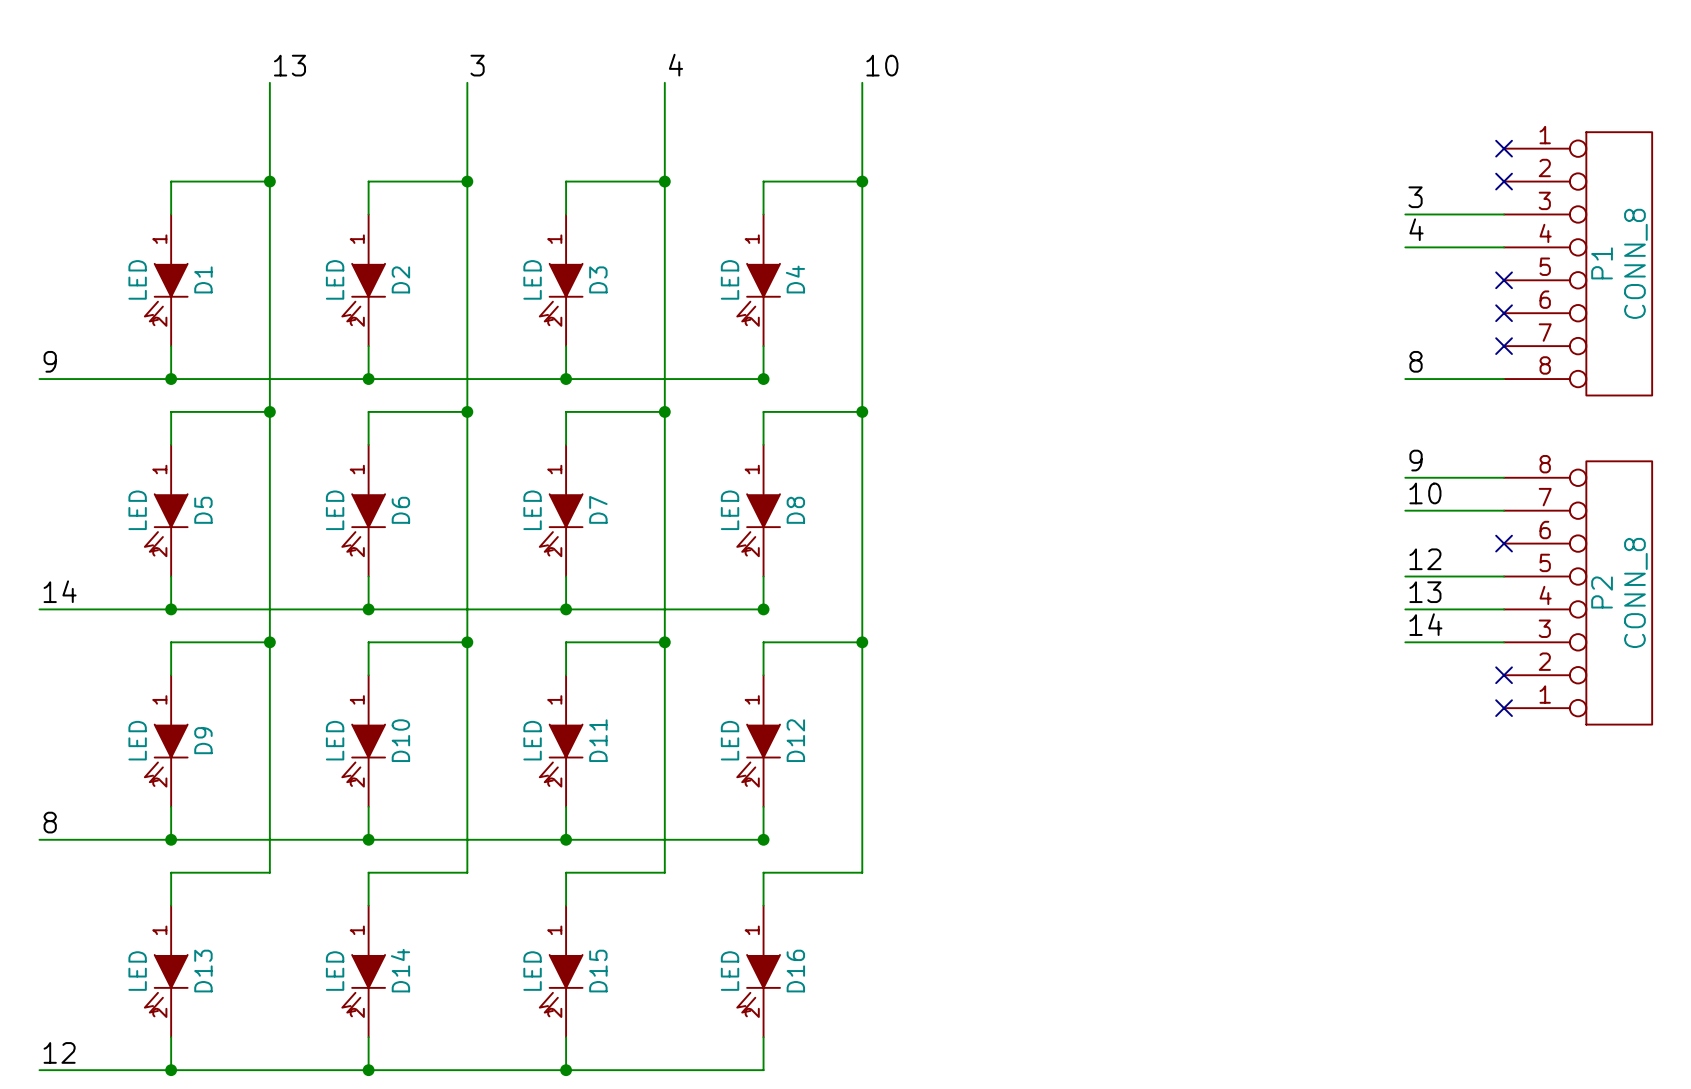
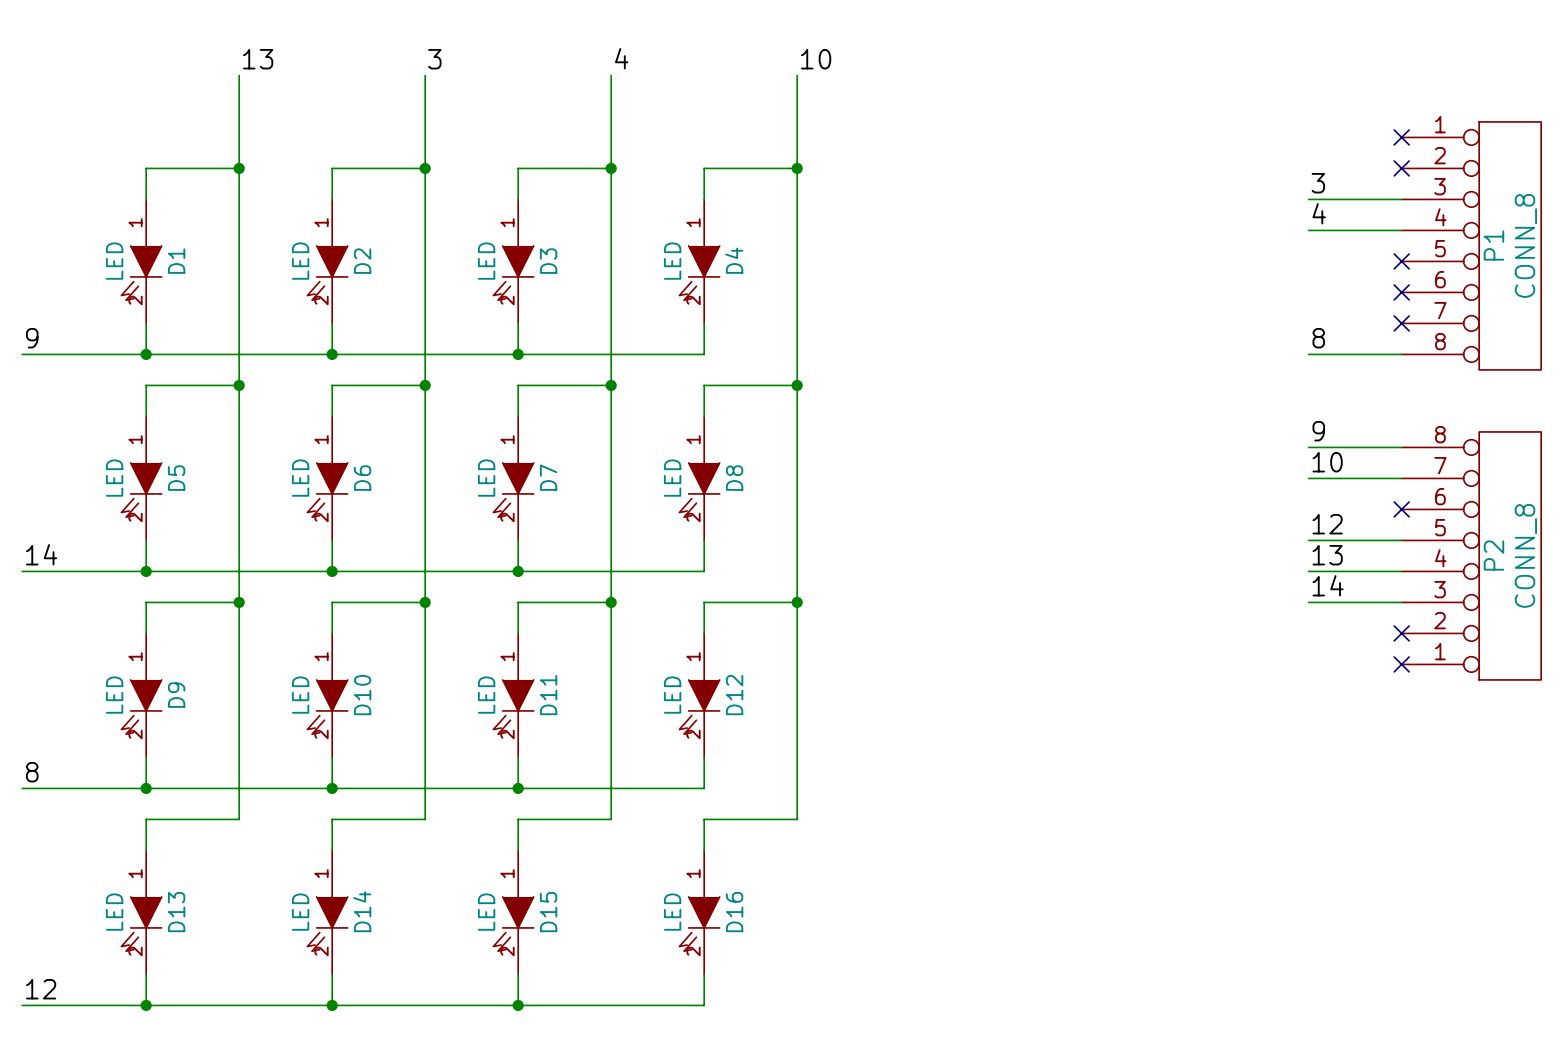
junction: (763, 379) -> none
junction: (763, 609) -> none
junction: (763, 839) -> none

